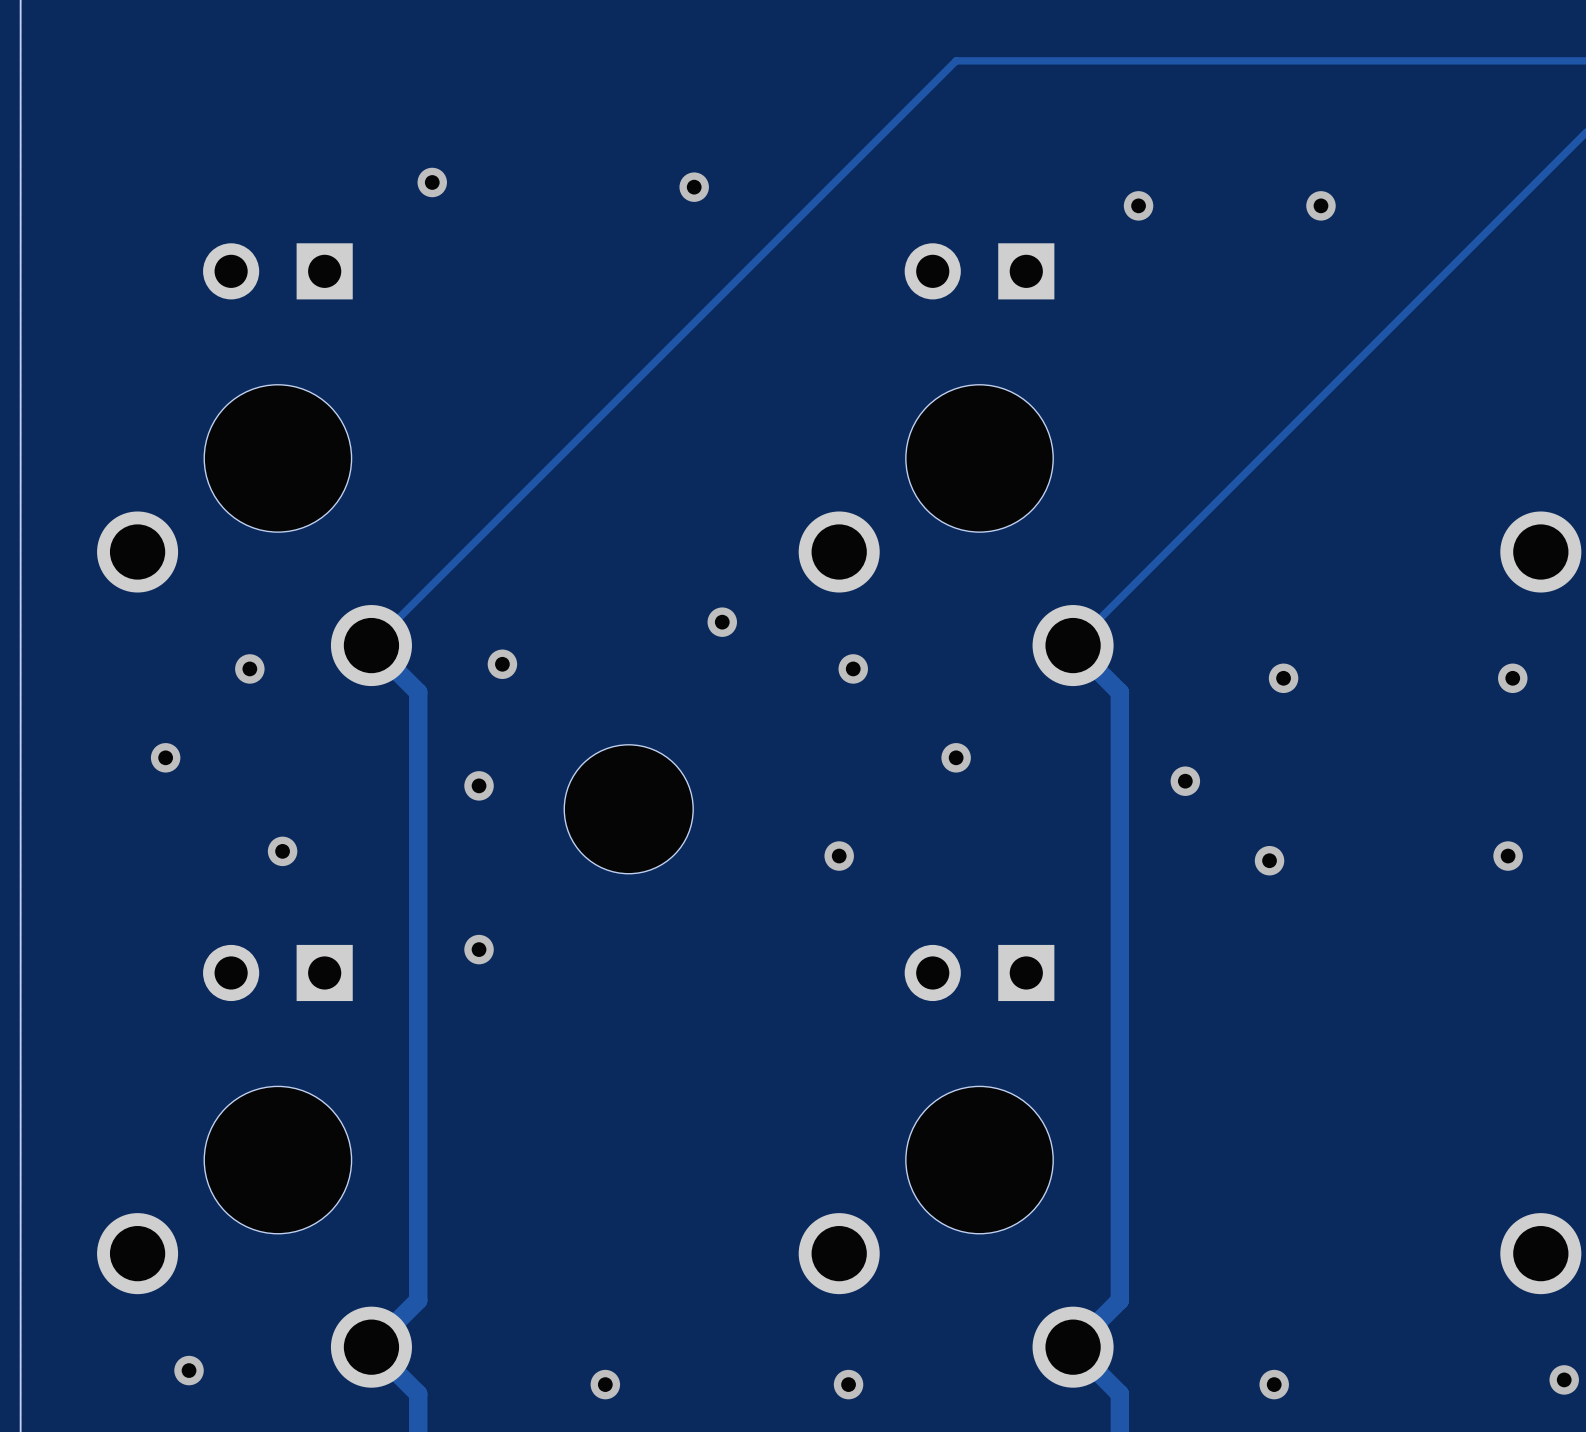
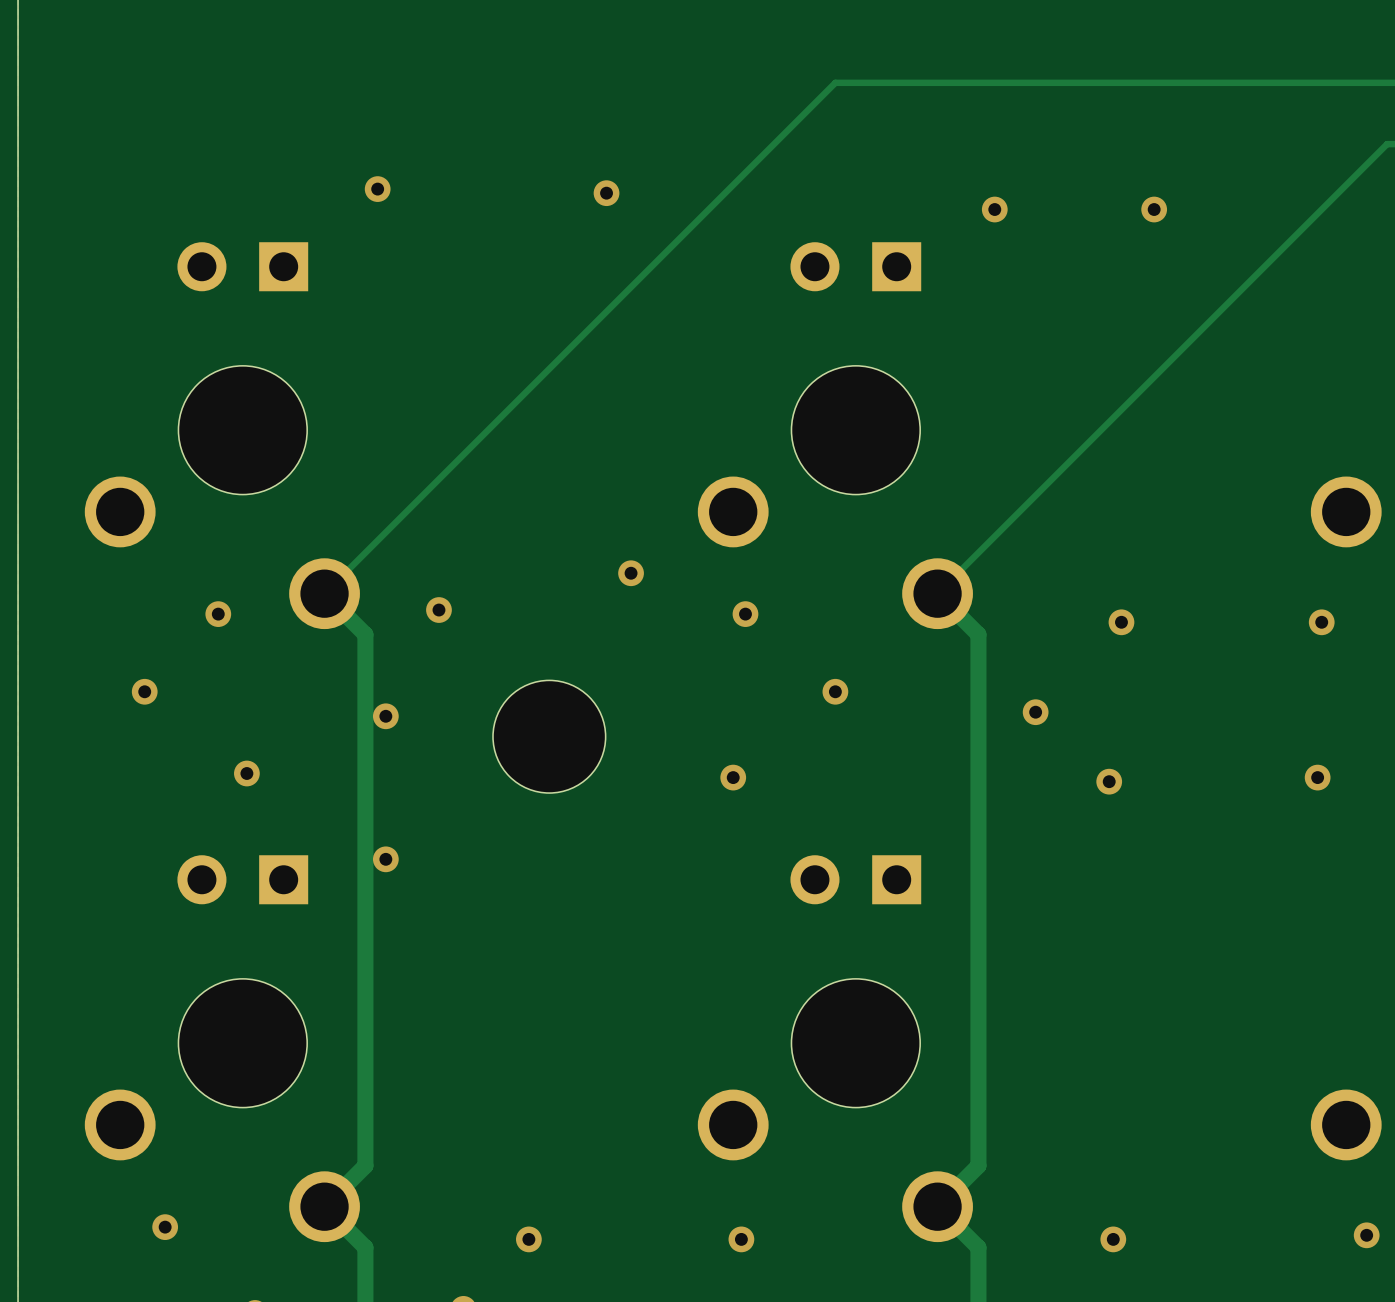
via position: (479, 785) -> (385, 716)
via position: (479, 949) -> (385, 859)

